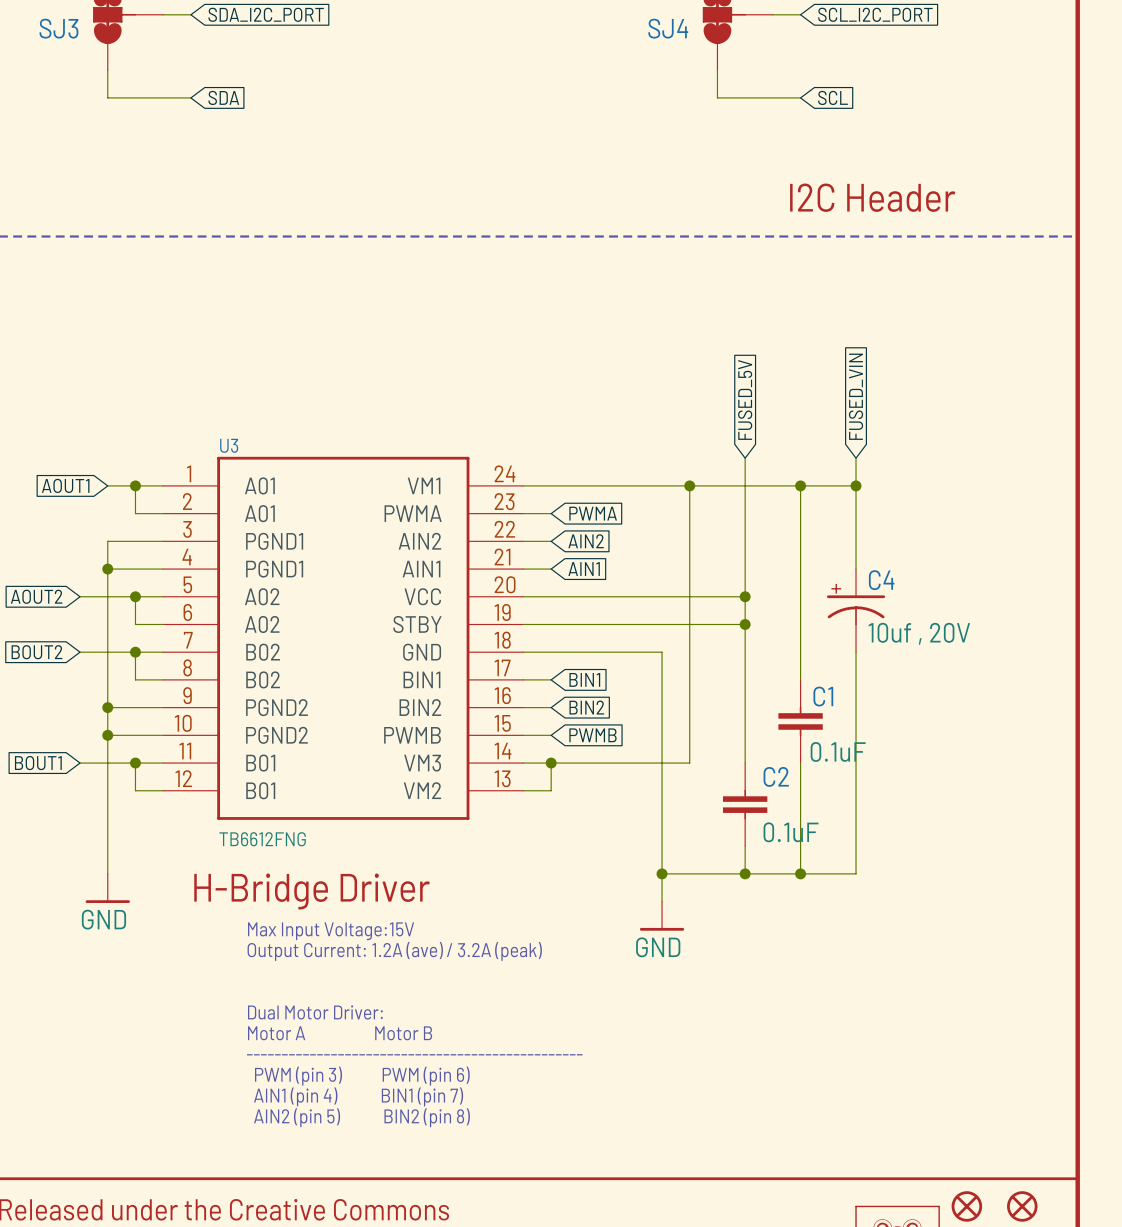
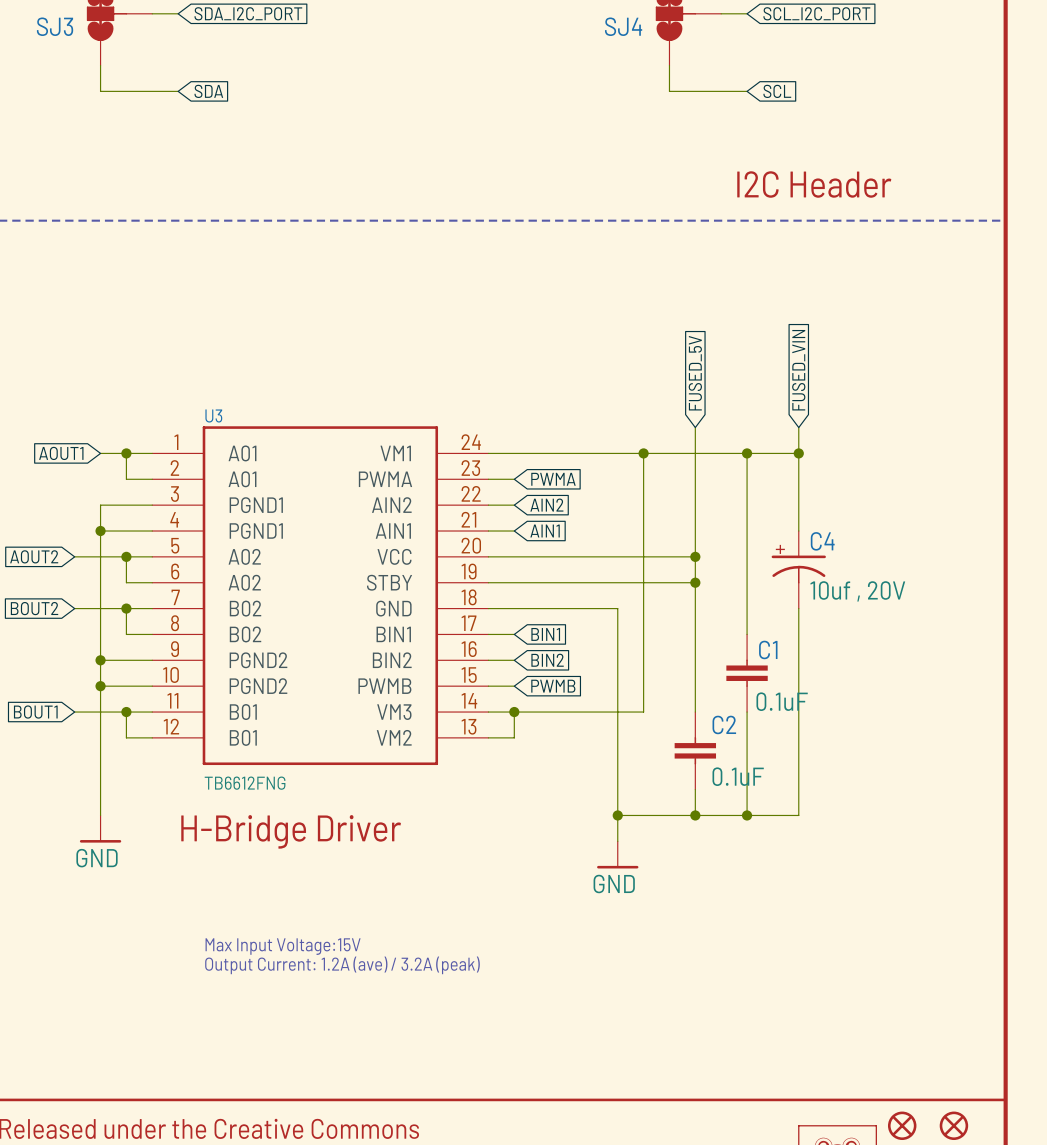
text position: Max Input Voltage:15V (331, 931) -> Max Input Voltage:15V (283, 946)
text position: Output Current: 1.2A (ave) / 3.2A (peak) (394, 951) -> Output Current: 1.2A (ave) / 3.2A (peak) (342, 965)
text: Dual Motor Driver: (315, 1012) -> none
text: Motor A Motor B (340, 1033) -> none
text: ------------------------------------------------ (414, 1054) -> none
text: PWM (pin 3) PWM (pin 6) (362, 1076) -> none
text: AIN1 (pin 4) BIN1 (pin 7) (358, 1096) -> none
text: AIN2 (pin 5) BIN2 (pin 8) (361, 1117) -> none

